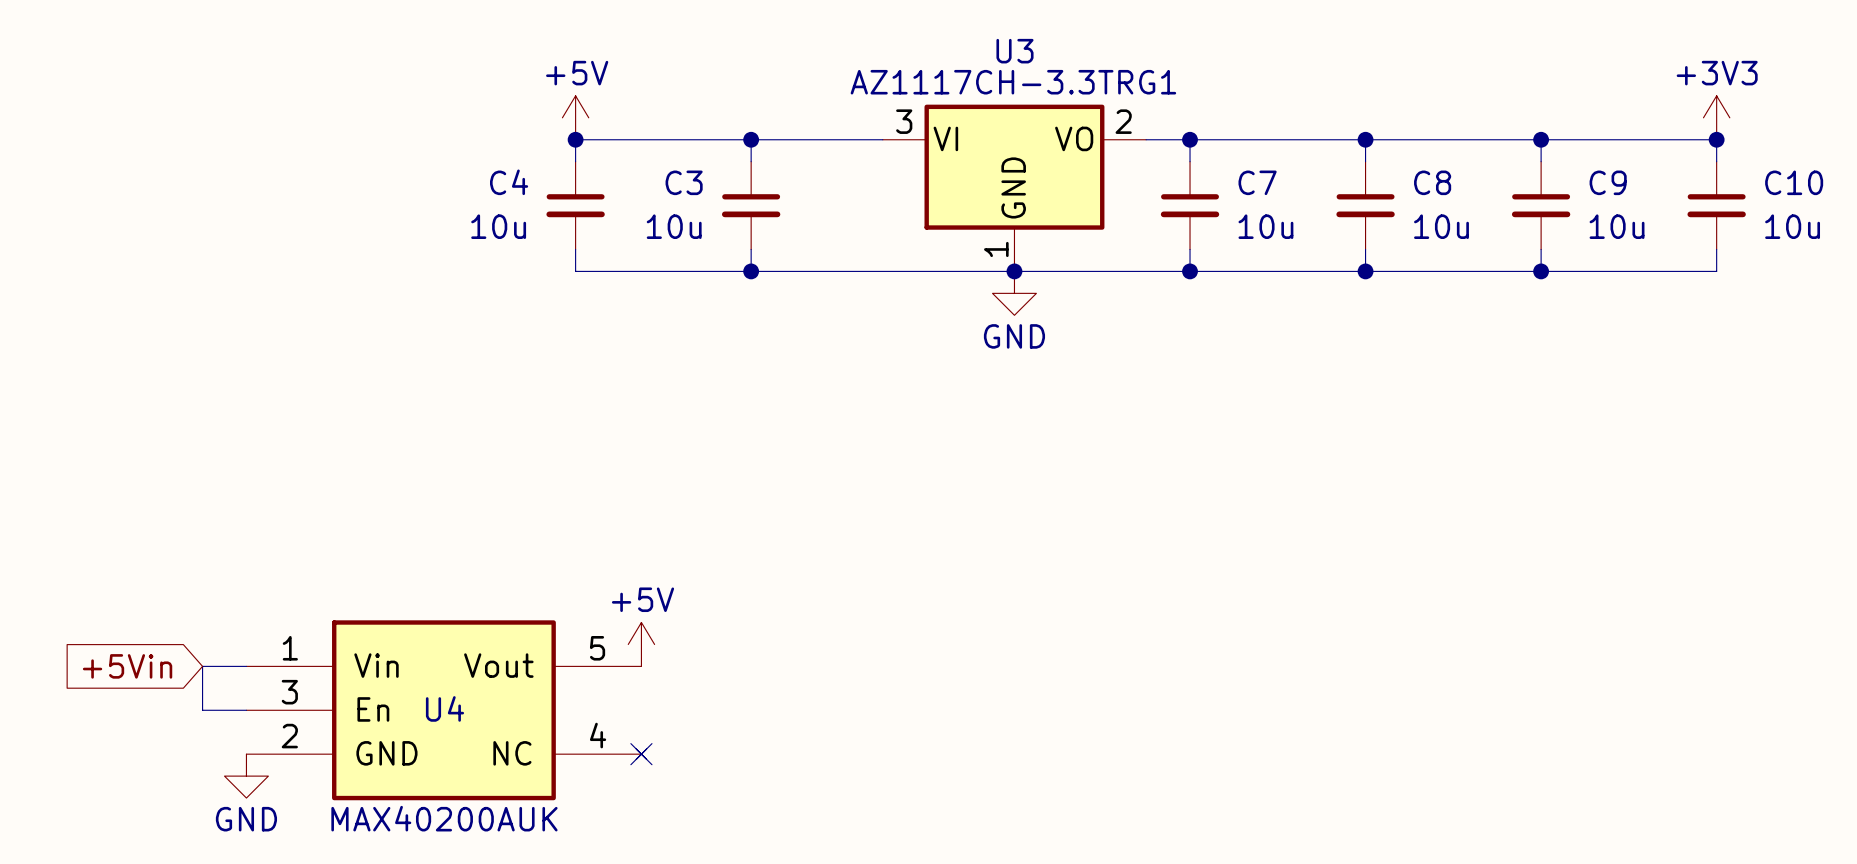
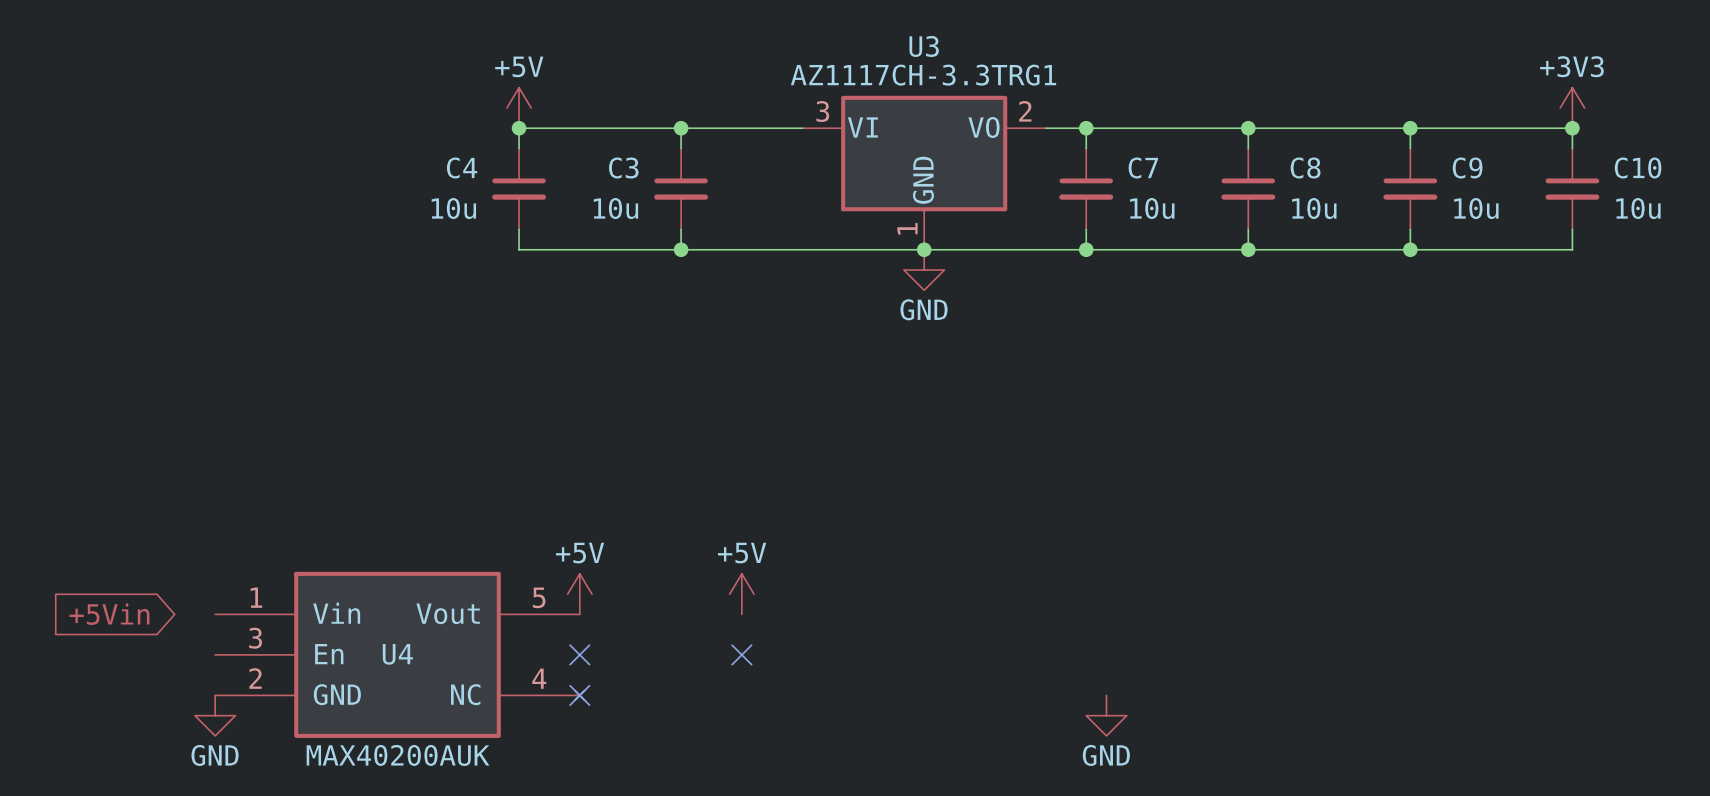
power symbol: none -> +5V (741, 594)
wire: (246, 666) (202, 666) (202, 710) (246, 710) -> none
no-connect mark: none -> (579, 654)
no-connect mark: none -> (741, 654)
power symbol: none -> GND (1106, 715)

